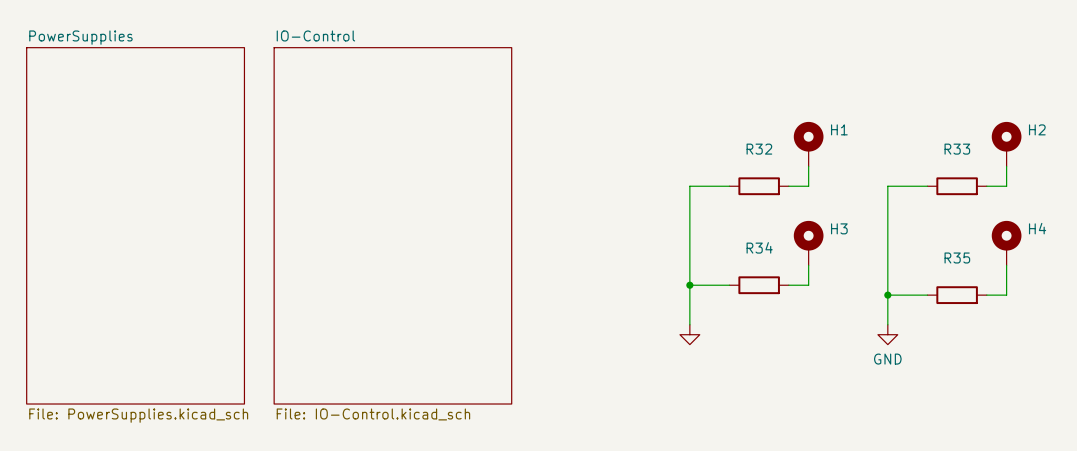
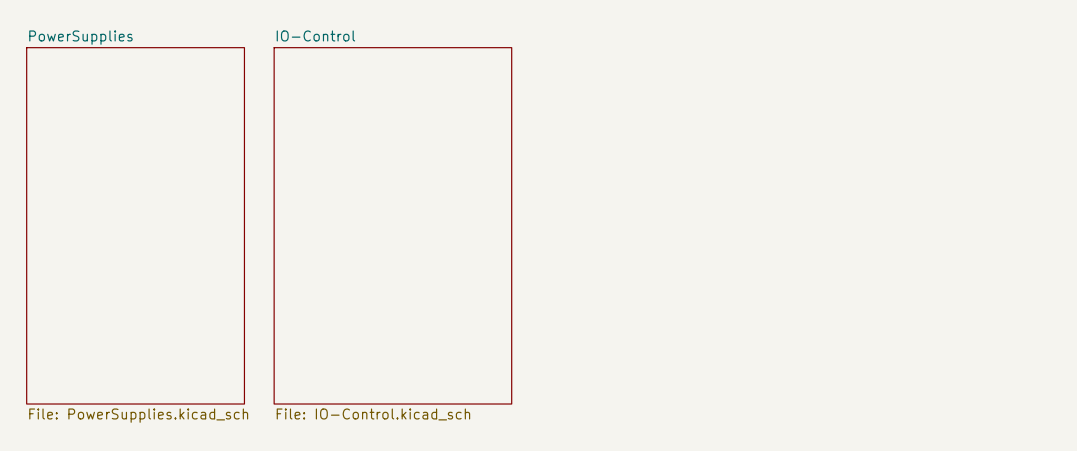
H1: (808, 144) -> none
H2: (1006, 144) -> none
wire: (808, 166) (808, 186) (788, 186) -> none
wire: (1006, 166) (1006, 186) (986, 186) -> none
wire: (729, 186) (689, 186) (689, 324) -> none
R32: (759, 186) -> none
wire: (927, 186) (887, 186) (887, 324) -> none
R33: (957, 186) -> none
H3: (808, 243) -> none
H4: (1006, 243) -> none
wire: (808, 265) (808, 285) (788, 285) -> none
wire: (1006, 265) (1006, 295) (986, 295) -> none
wire: (689, 285) (729, 285) -> none
junction: (689, 285) -> none
R34: (759, 285) -> none
wire: (887, 295) (927, 295) -> none
junction: (887, 295) -> none
R35: (957, 295) -> none
power symbol: (689, 334) -> none
power symbol: GND (887, 334) -> none

